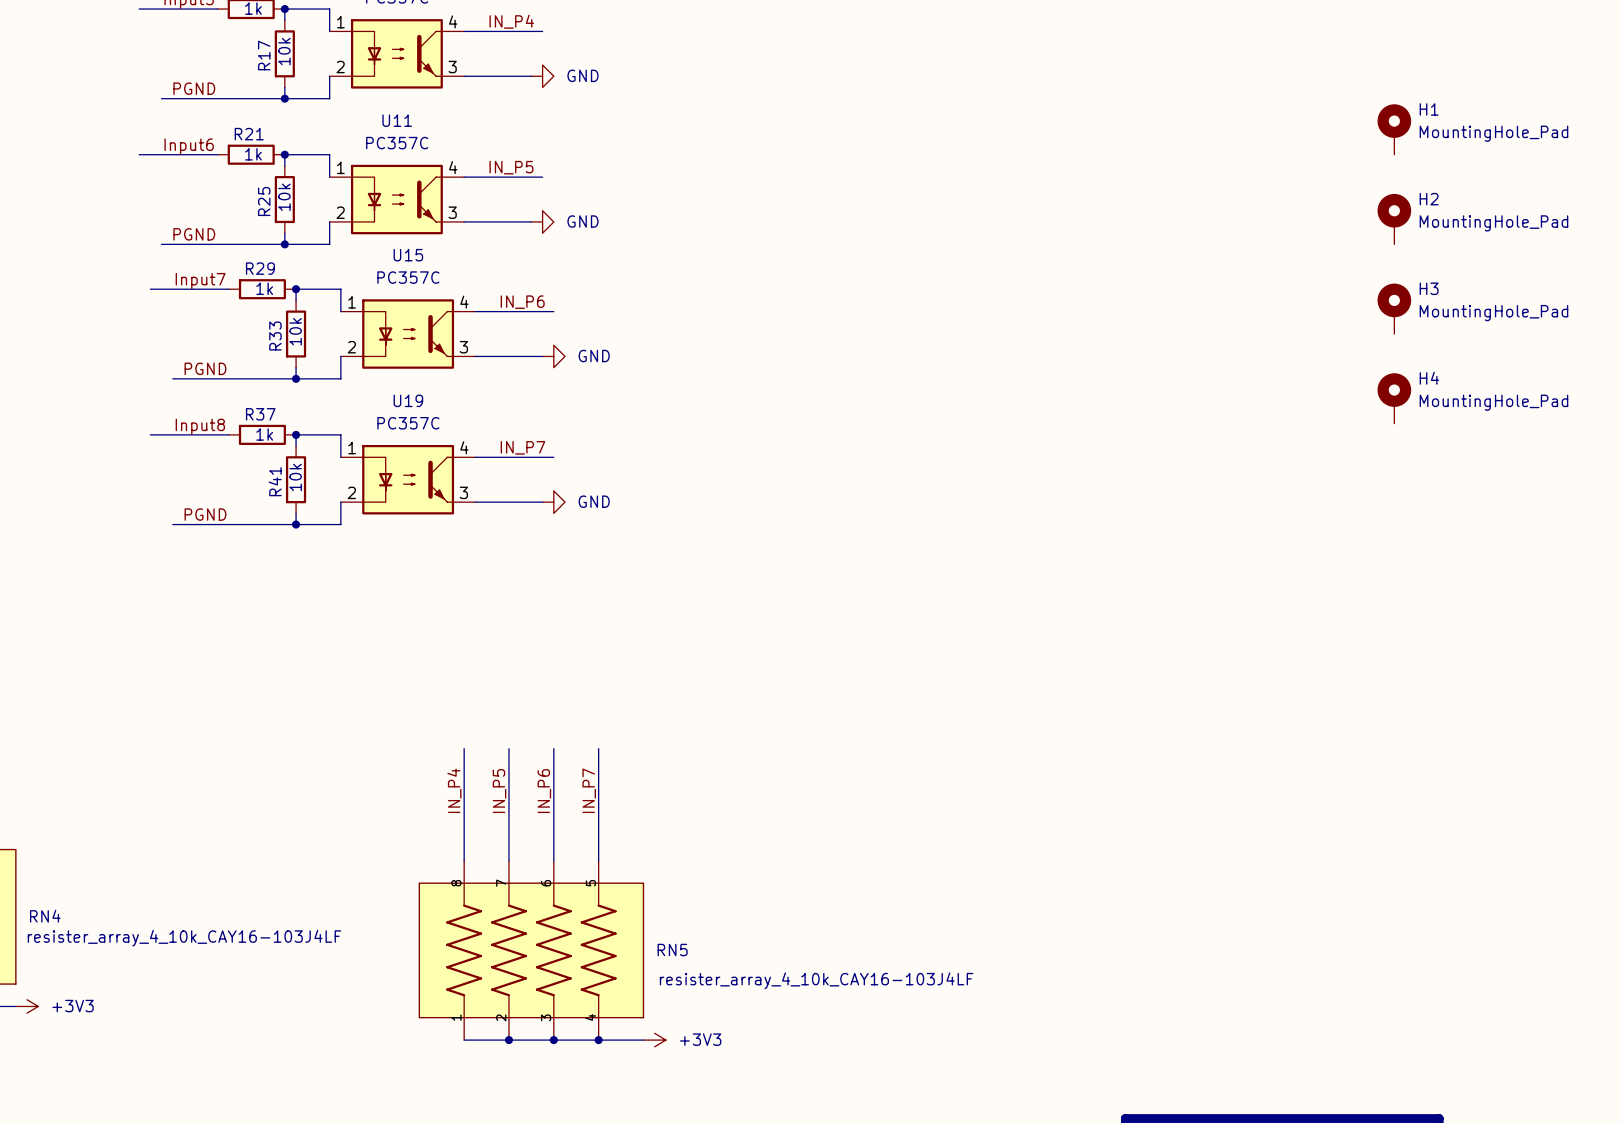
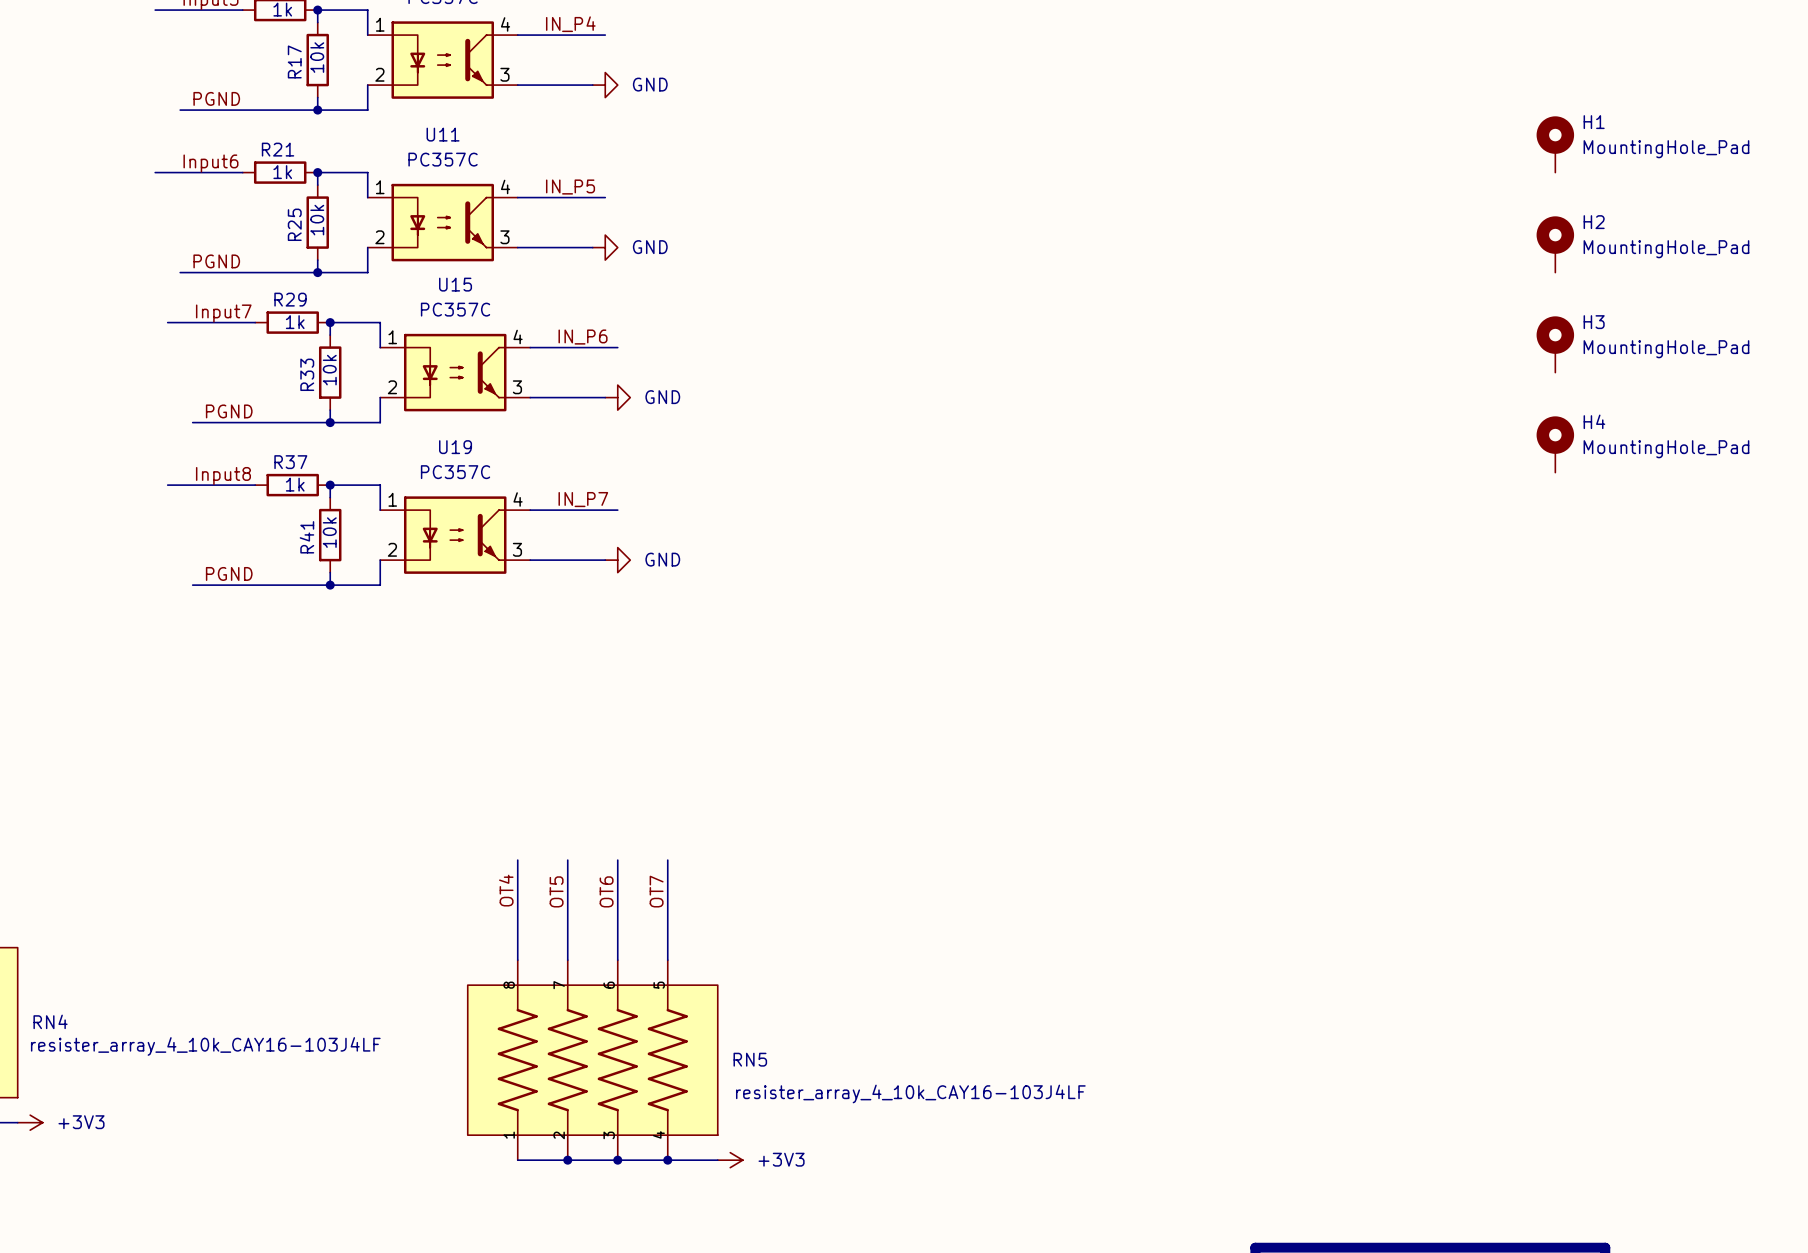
wire: (464, 748) (464, 771) -> none
wire: (508, 748) (508, 771) -> none
wire: (553, 748) (553, 771) -> none
wire: (598, 748) (598, 771) -> none
label: IN_P4 (454, 790) -> none
label: IN_P7 (589, 790) -> OT7 (656, 891)
label: IN_P5 (499, 791) -> OT5 (556, 891)
label: IN_P6 (544, 791) -> OT6 (606, 891)
label: none -> OT4 (506, 890)

